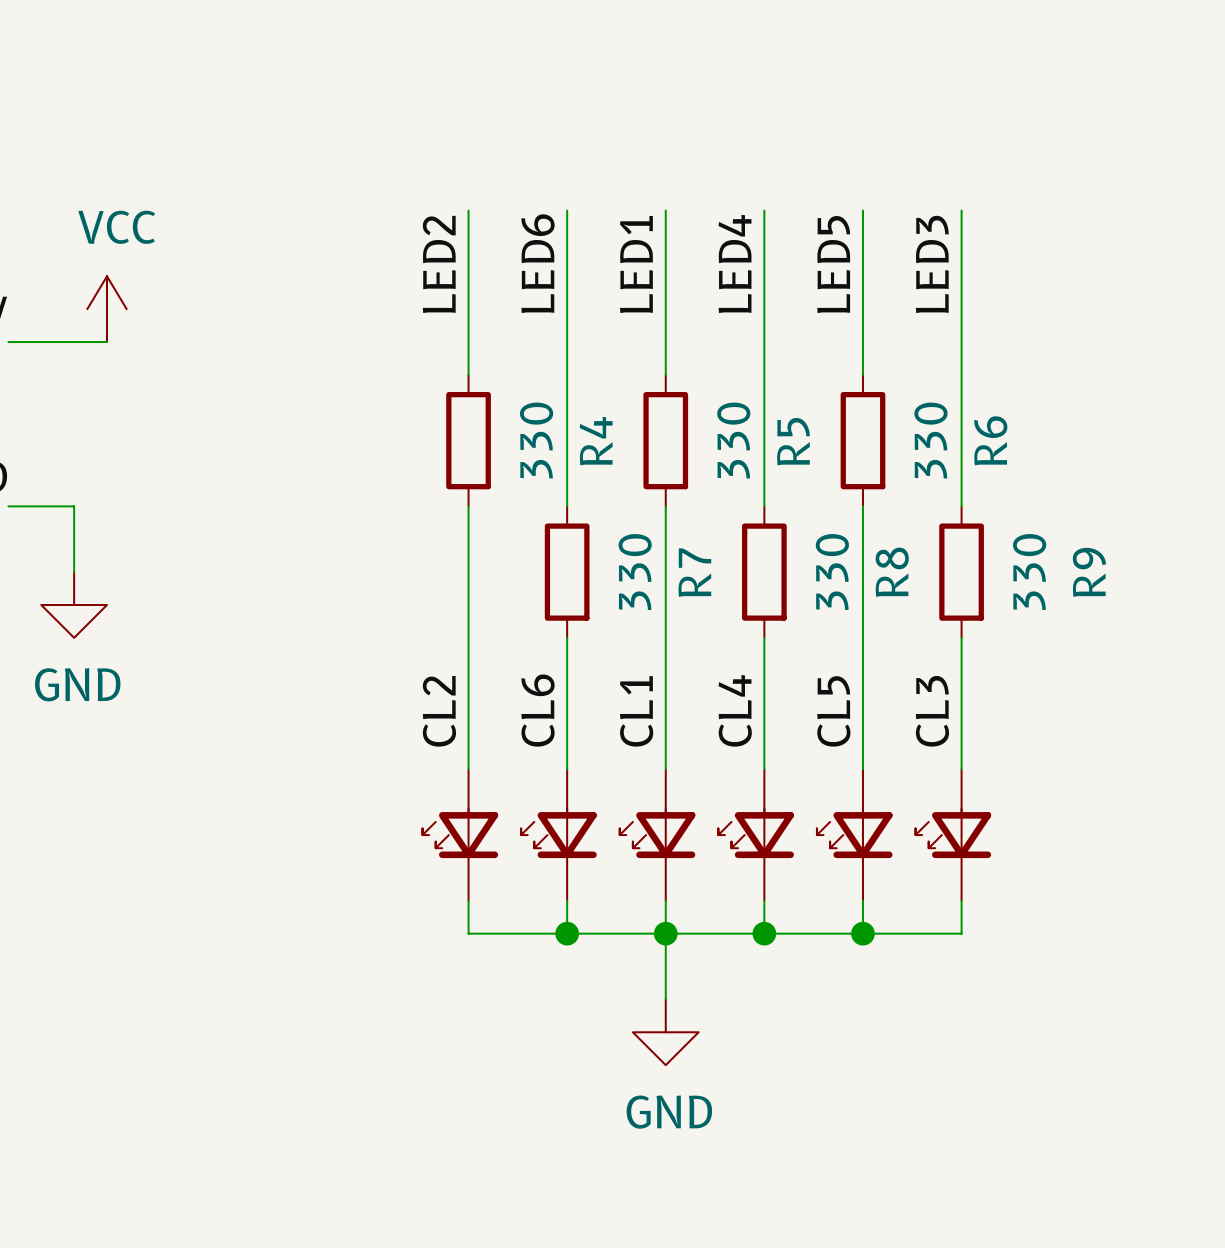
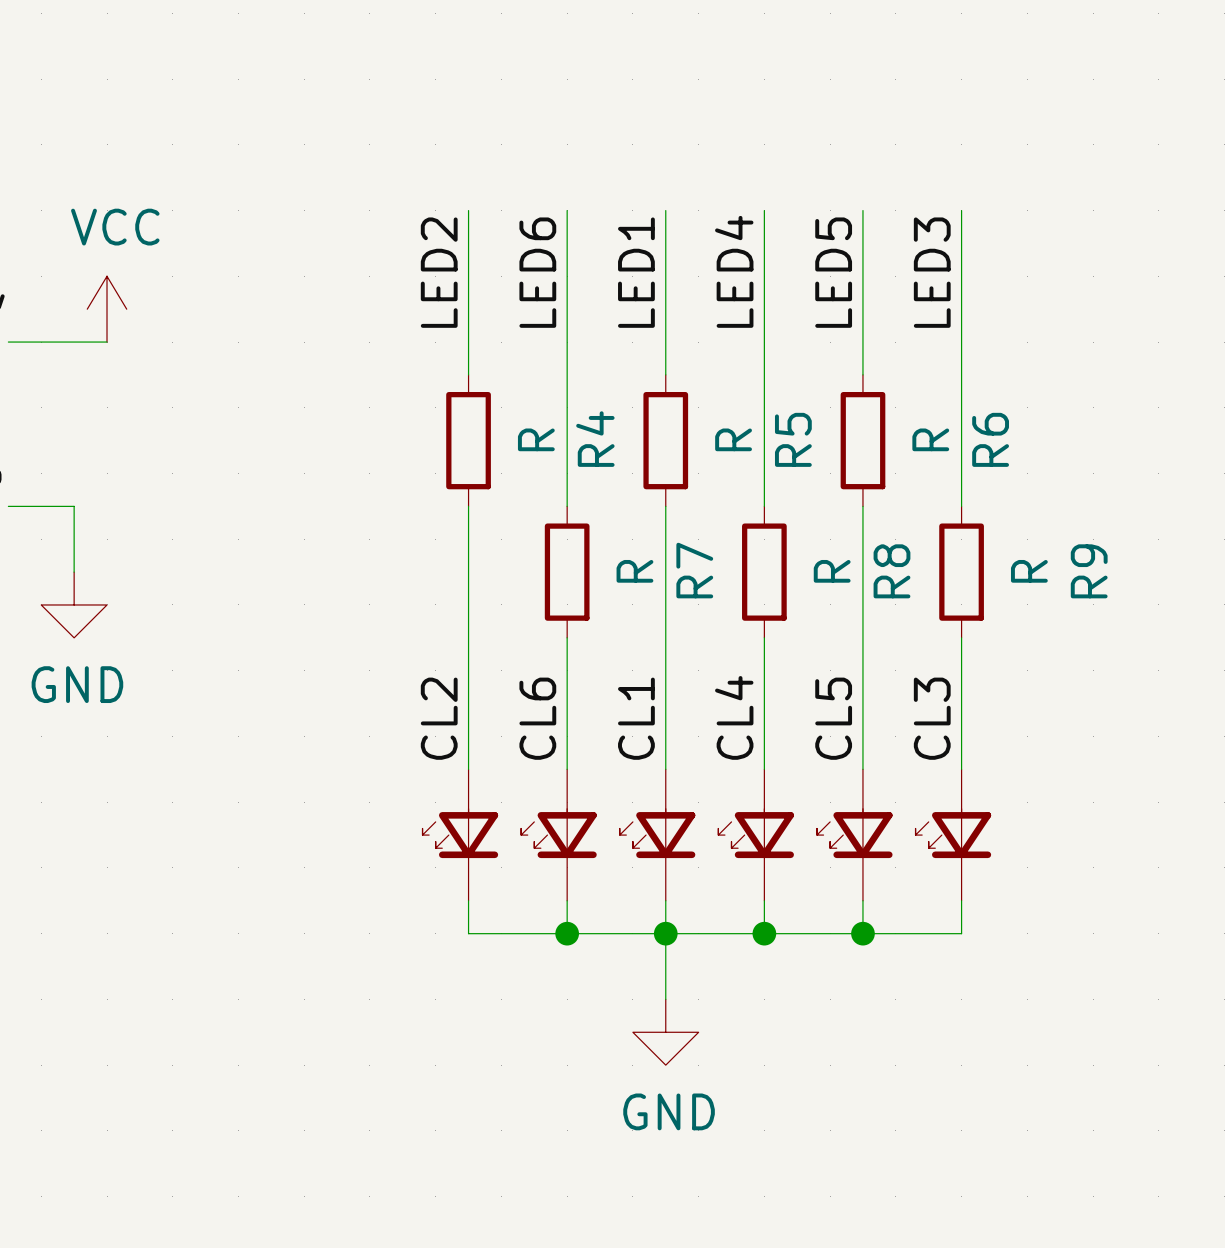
R4 value: 330 (536, 440) -> R (536, 439)
R5 value: 330 (733, 440) -> R (733, 439)
R6 value: 330 (930, 440) -> R (930, 439)
R7 value: 330 (635, 572) -> R (634, 571)
R8 value: 330 (832, 572) -> R (832, 571)
R9 value: 330 (1029, 572) -> R (1029, 571)

